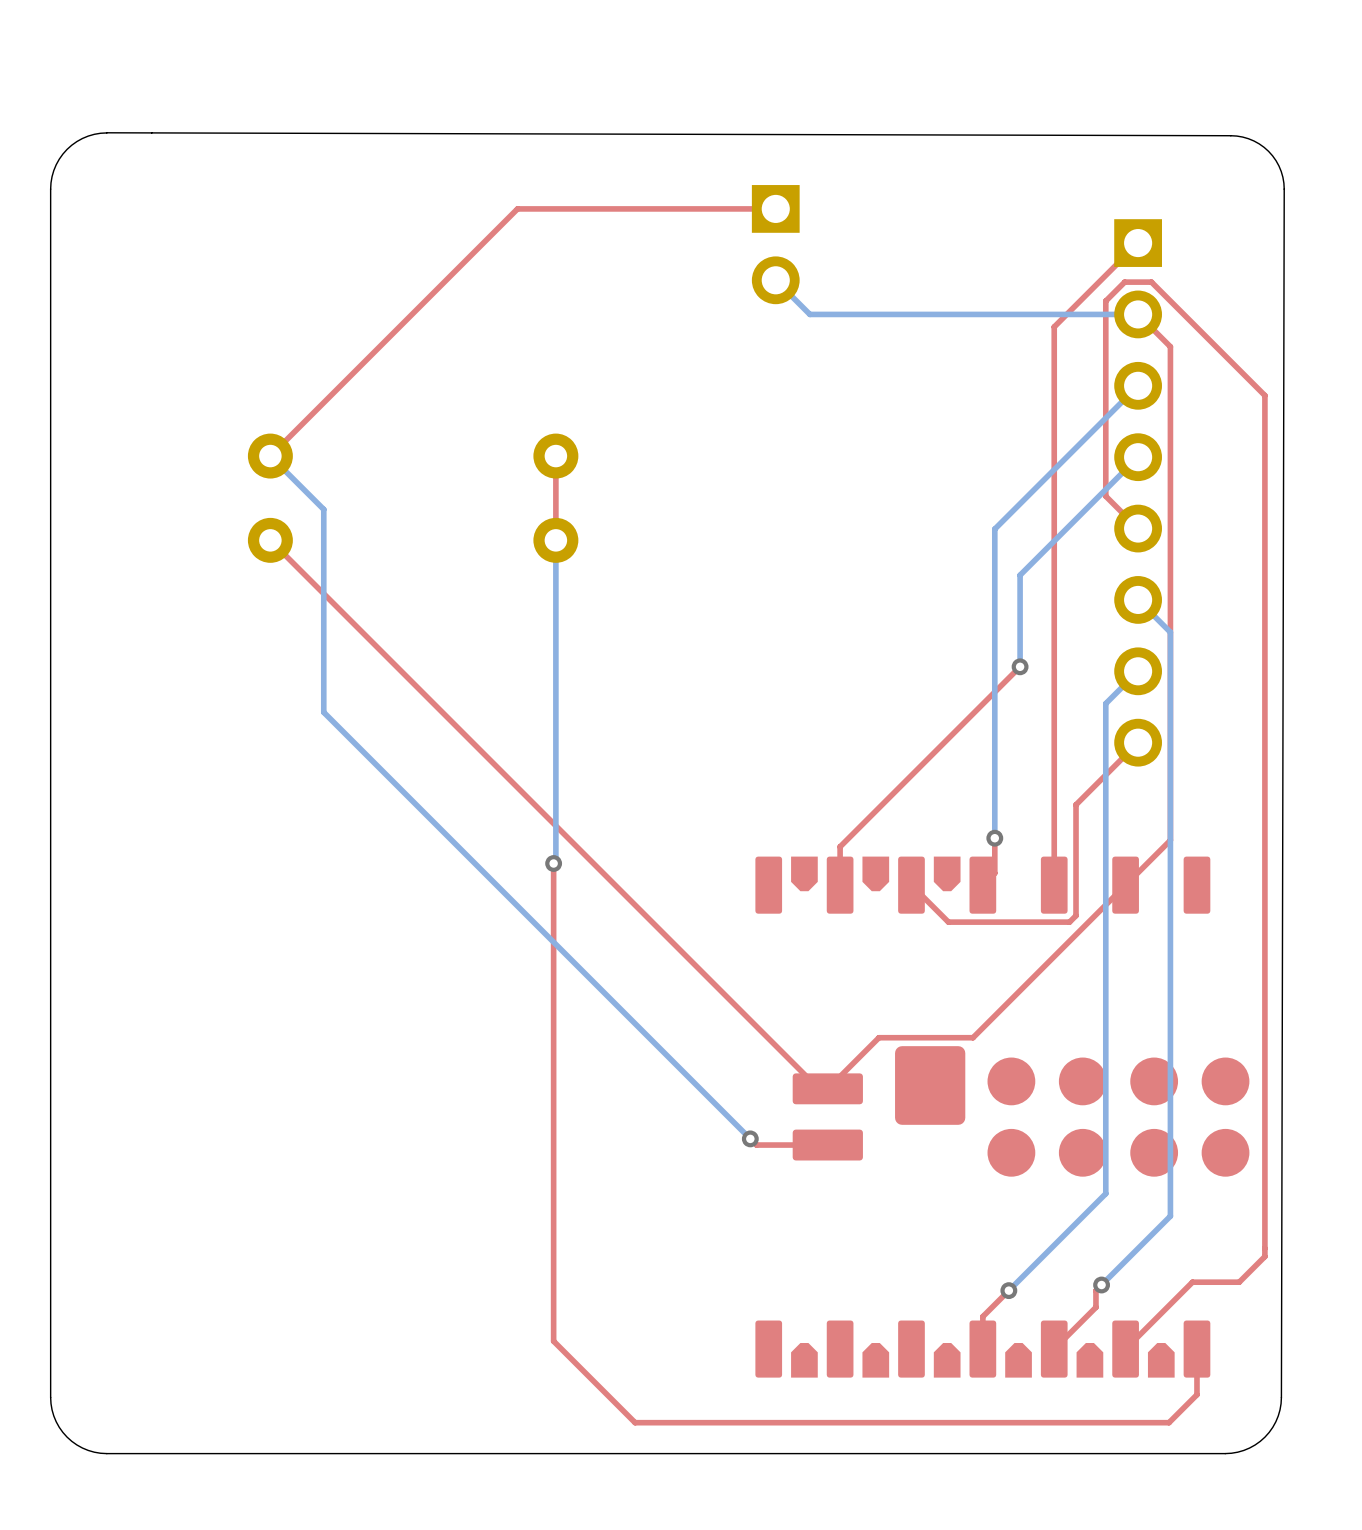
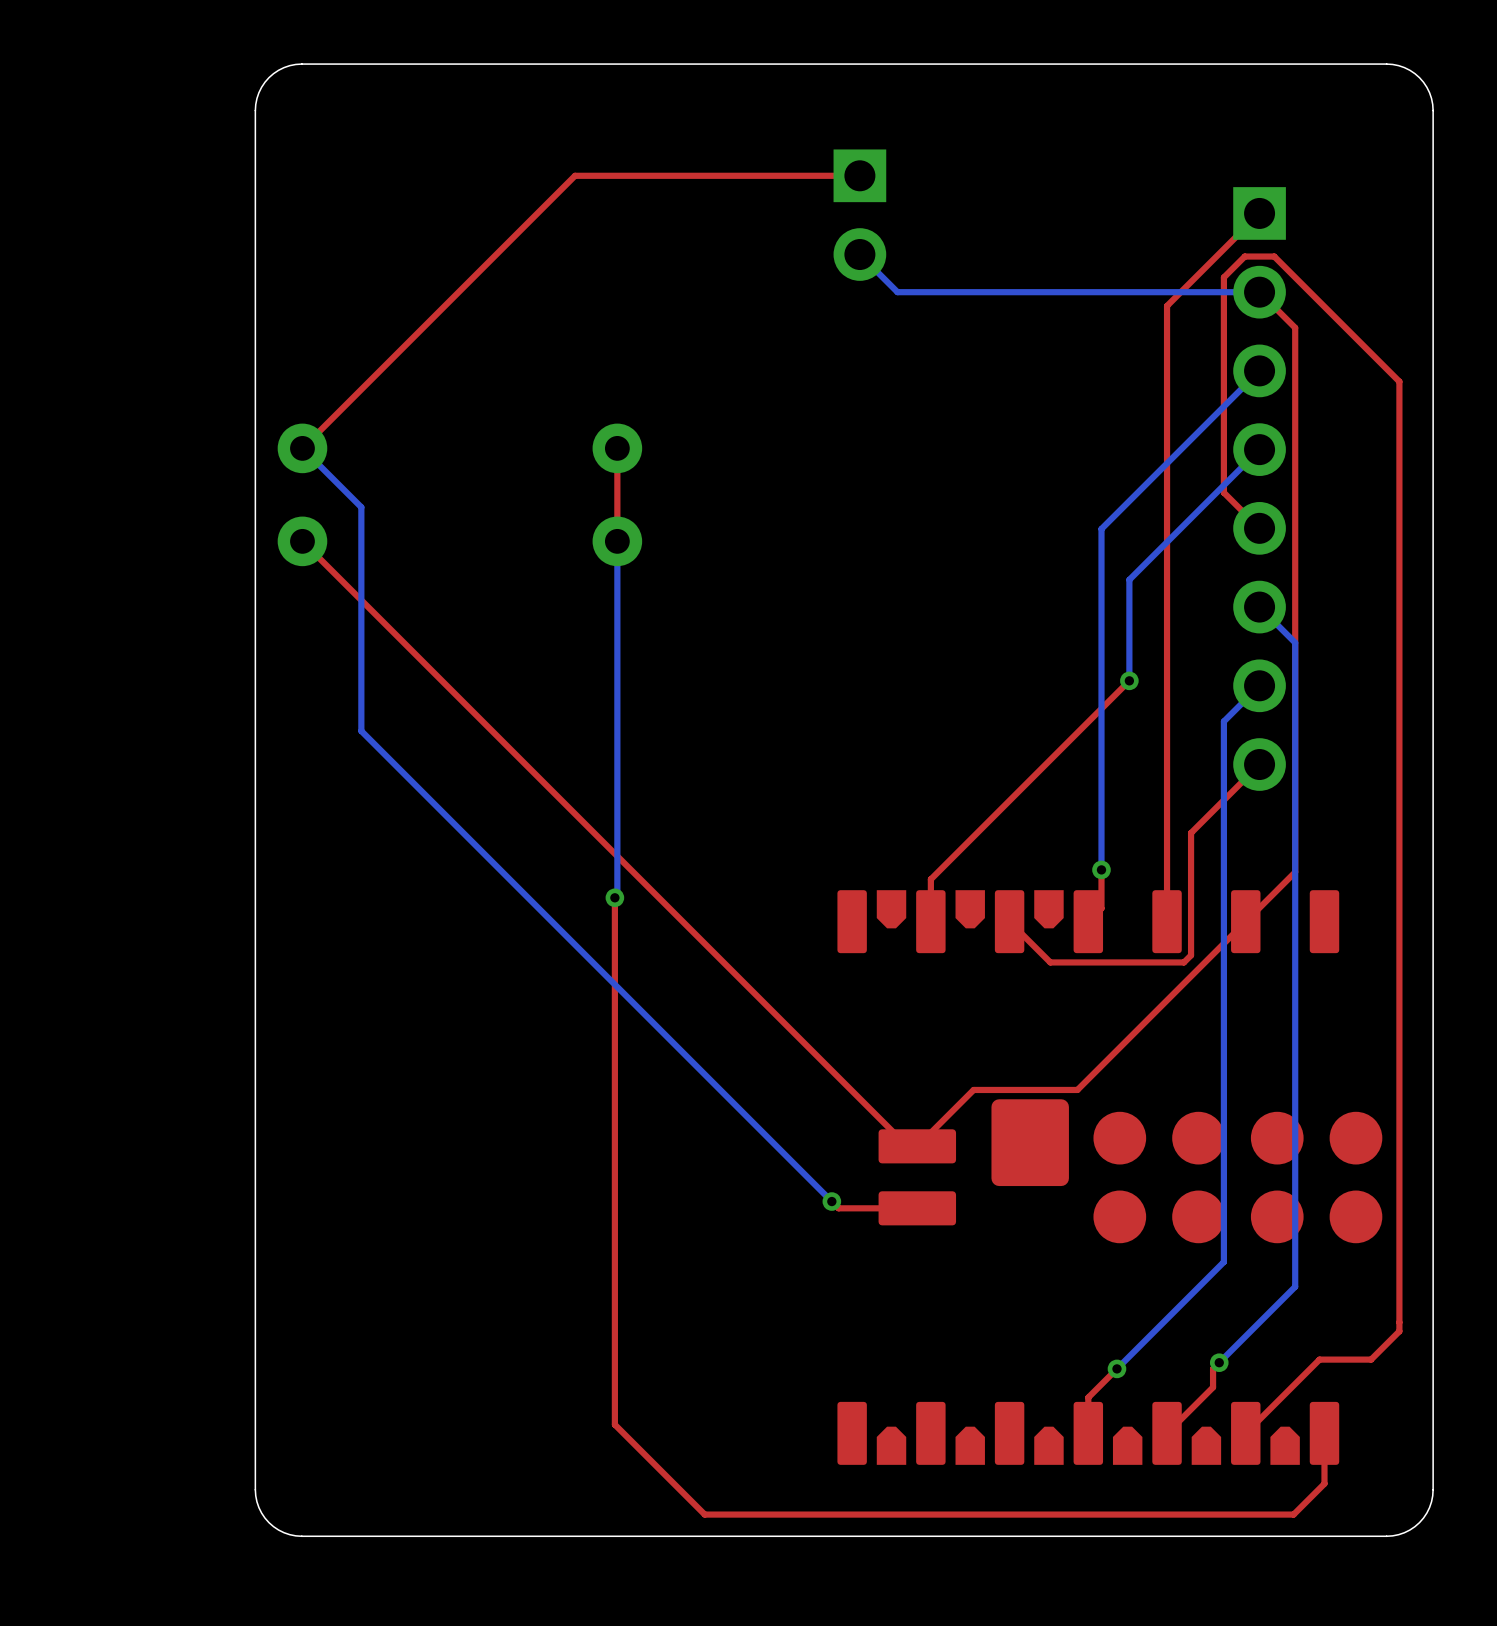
board edge: (106, 132) (1230, 135) (1254, 141) (1272, 155) (1281, 171) (1284, 189) (1281, 1397) (1275, 1421) (1260, 1441) (1243, 1450) (1225, 1453) (106, 1453) (82, 1448) (62, 1432) (53, 1415) (50, 1397) (50, 189) (56, 164) (67, 149) (88, 136) (106, 132) -> (1386, 64) (1404, 67) (1419, 77) (1429, 92) (1433, 110) (1433, 1489) (1431, 1501) (1423, 1518) (1409, 1530) (1398, 1534) (1386, 1536) (301, 1536) (284, 1532) (273, 1526) (264, 1518) (258, 1507) (255, 1489) (255, 110) (258, 92) (264, 82) (278, 70) (289, 65) (301, 64) (1386, 64)

